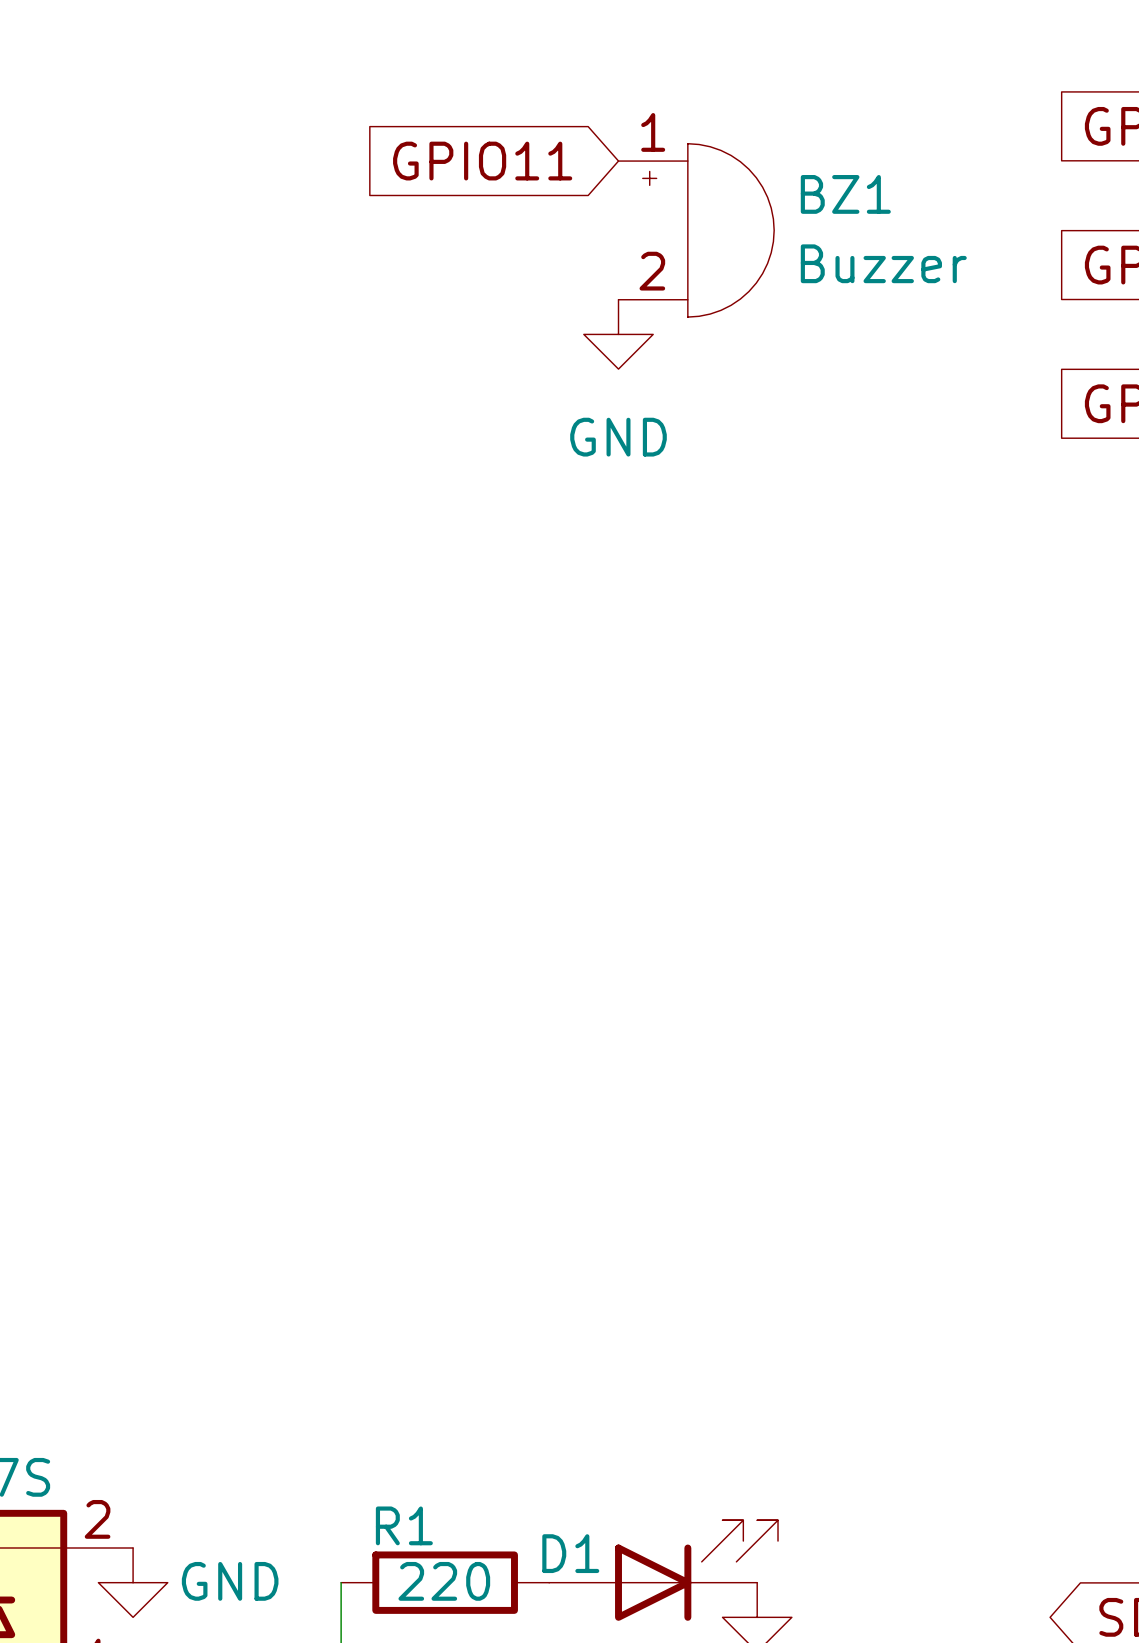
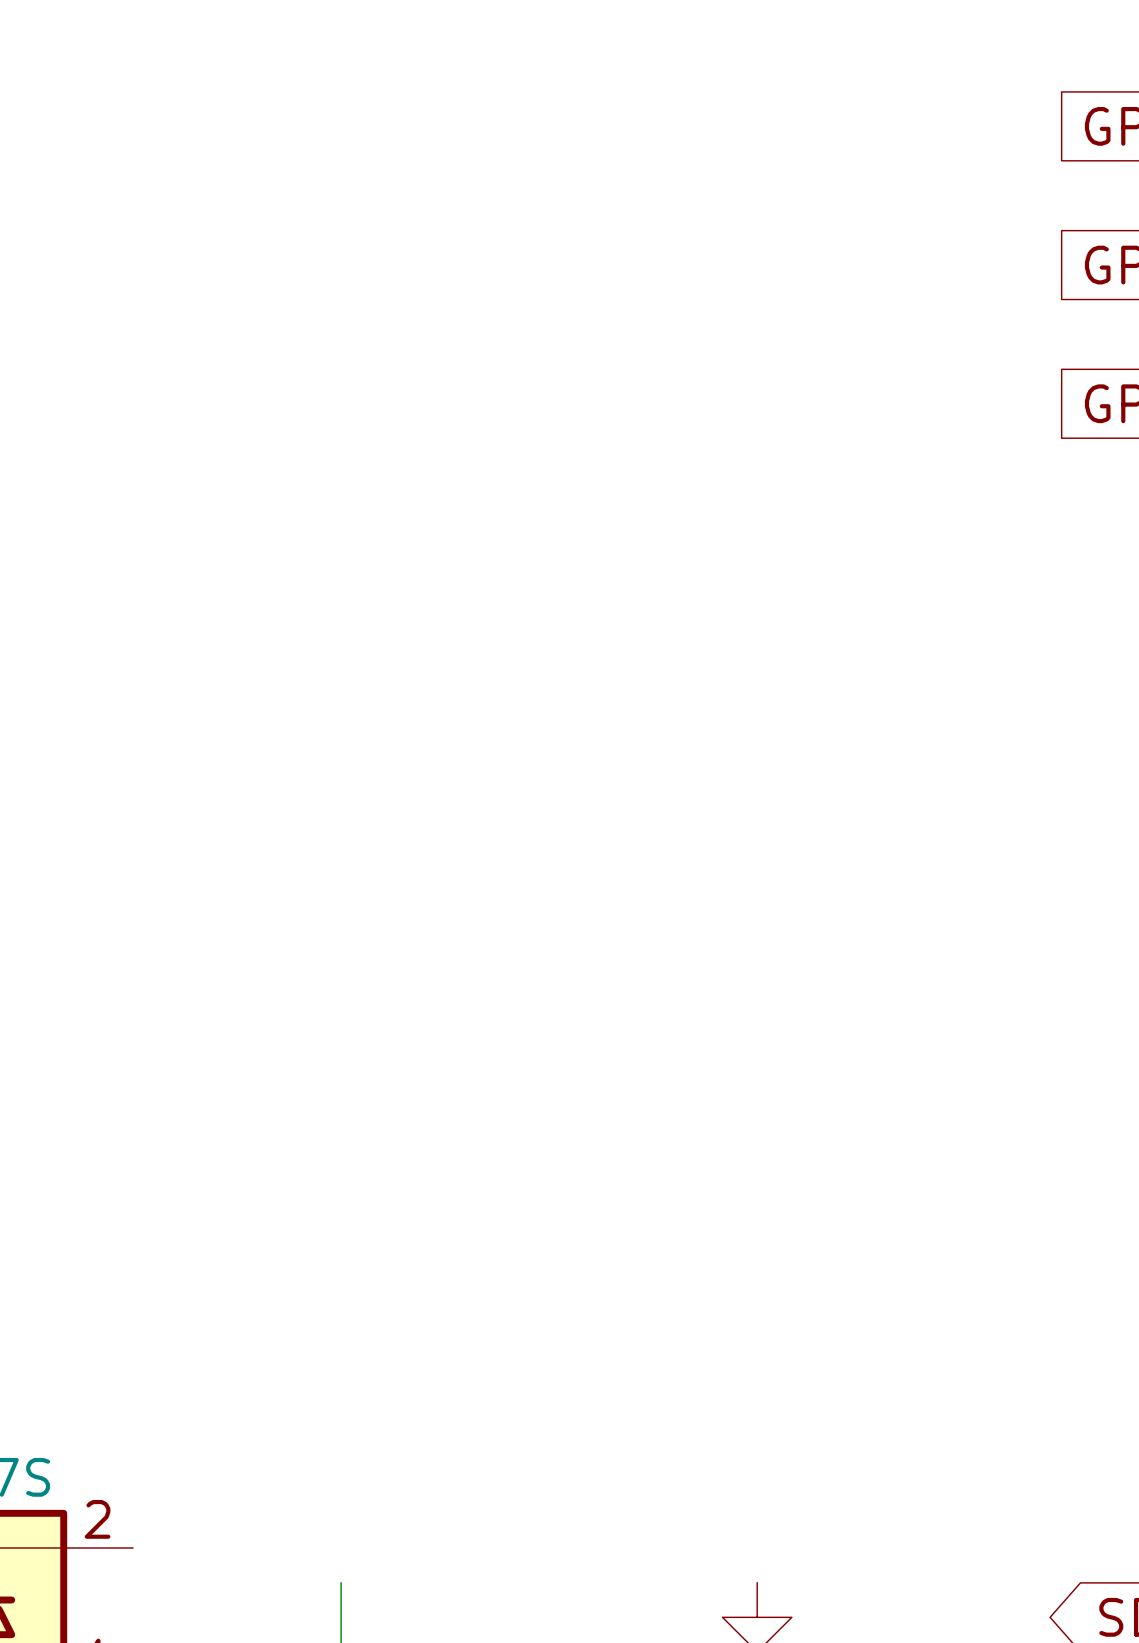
global label: GPIO11 (482, 161) -> none
BZ1: Buzzer (696, 230) -> none
power symbol: GND (618, 334) -> none
D1: (663, 1570) -> none
power symbol: GND (133, 1582) -> none
R1: 220 (445, 1582) -> none

